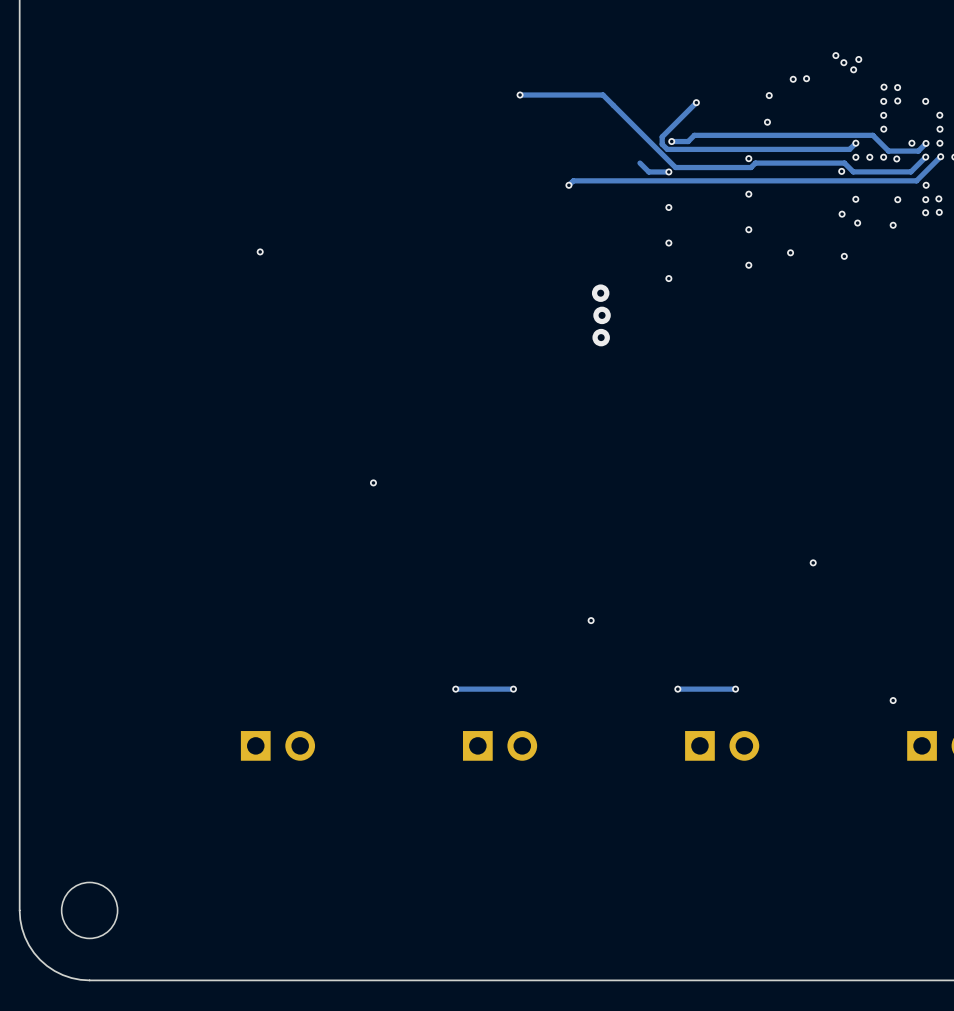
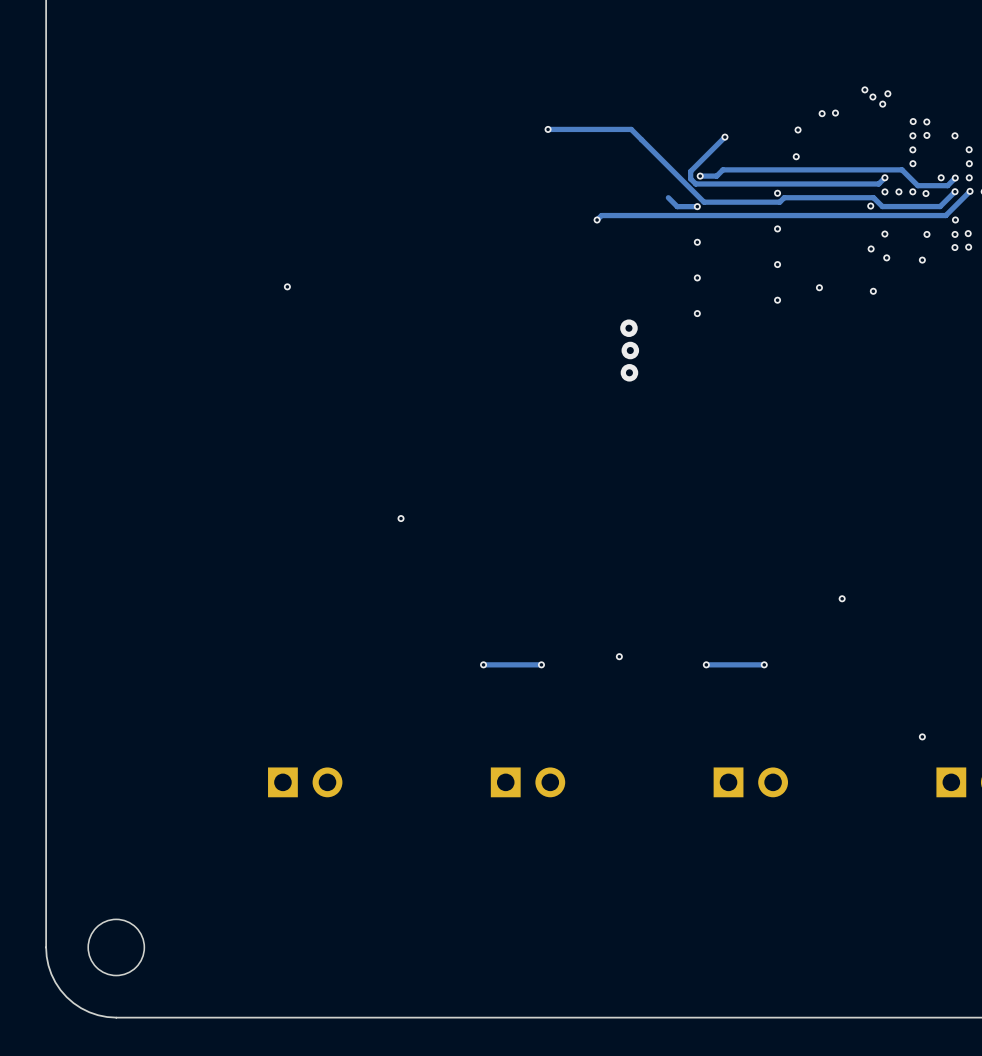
via: none -> (483, 664)
via: none -> (541, 664)
via: none -> (706, 664)
via: none -> (764, 664)
via: (455, 689) -> none
track: (513, 689) (455, 689) -> (541, 664) (483, 664)
via: (513, 689) -> none
via: (677, 689) -> none
track: (735, 689) (677, 689) -> (764, 664) (706, 664)
via: (735, 689) -> none

